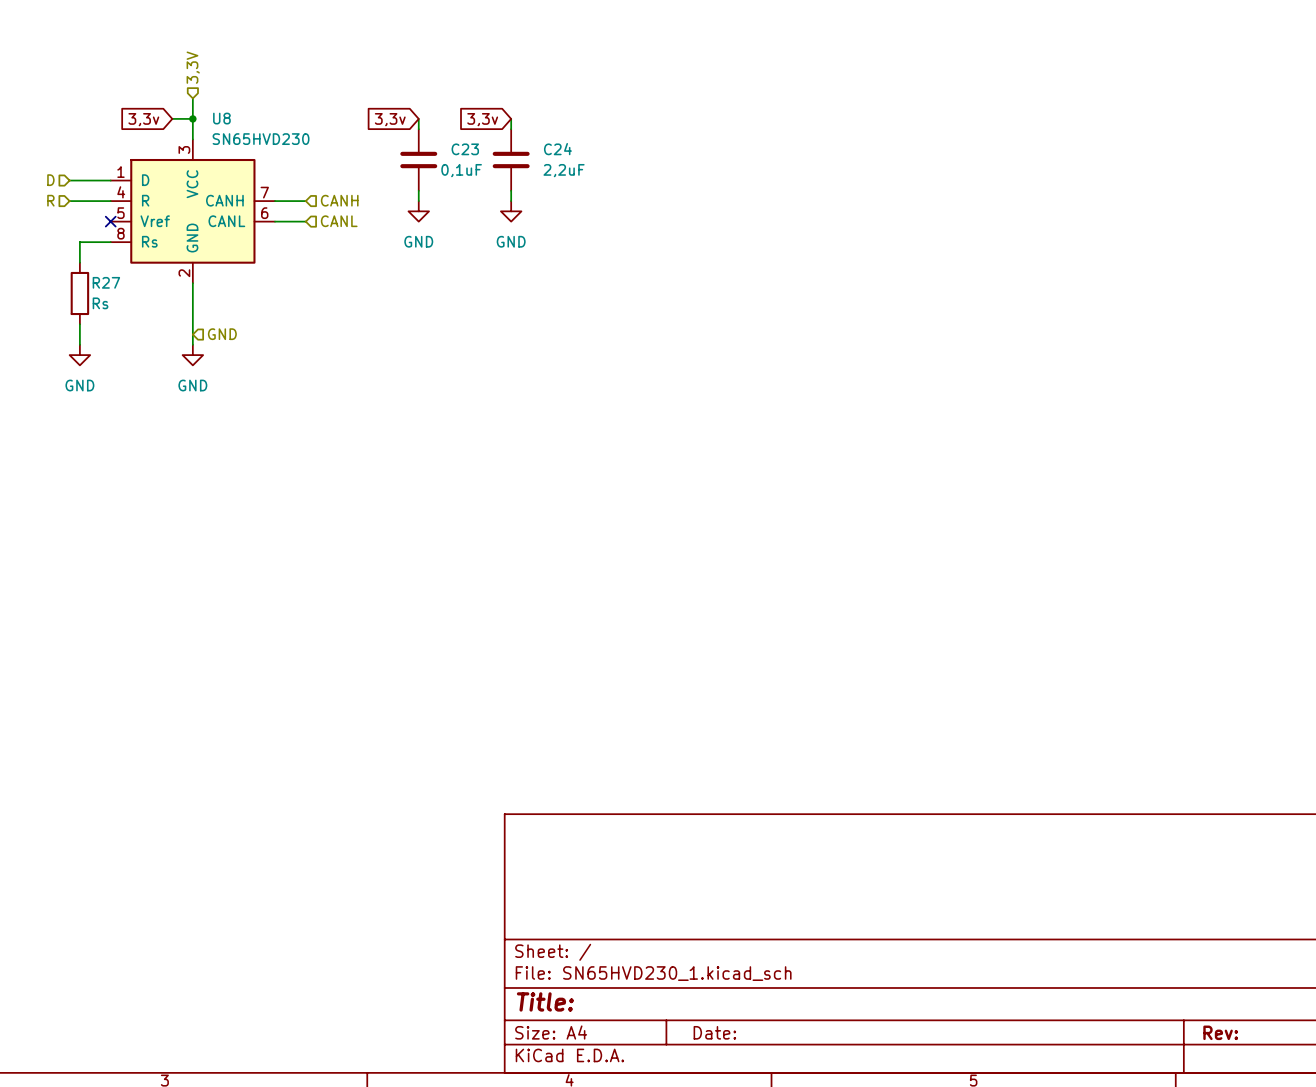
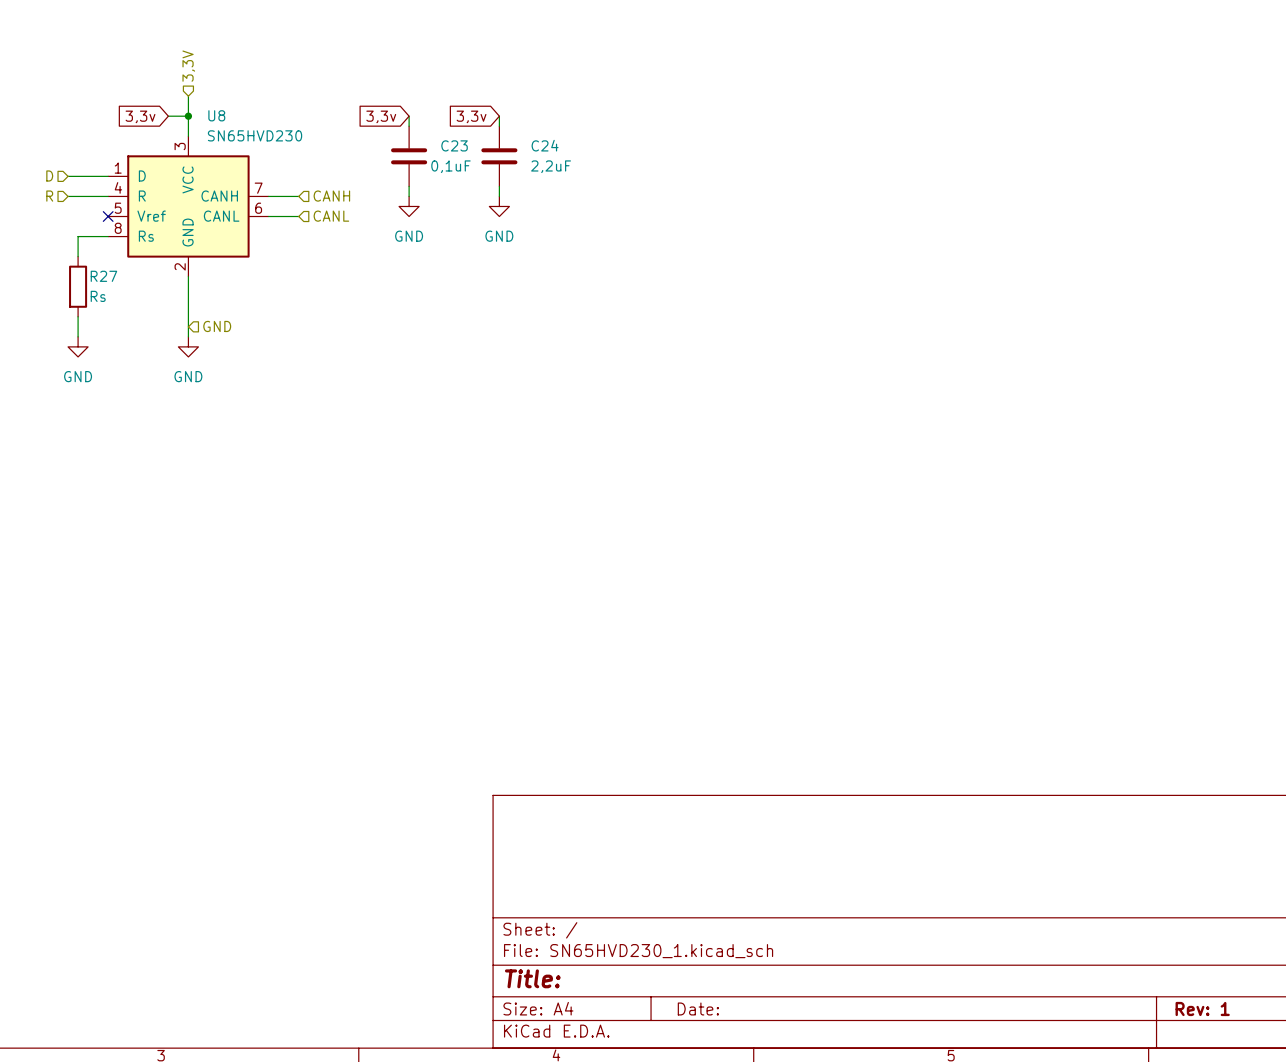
title block: Rev: (1220, 1032) -> Rev: 1 (1202, 1008)

